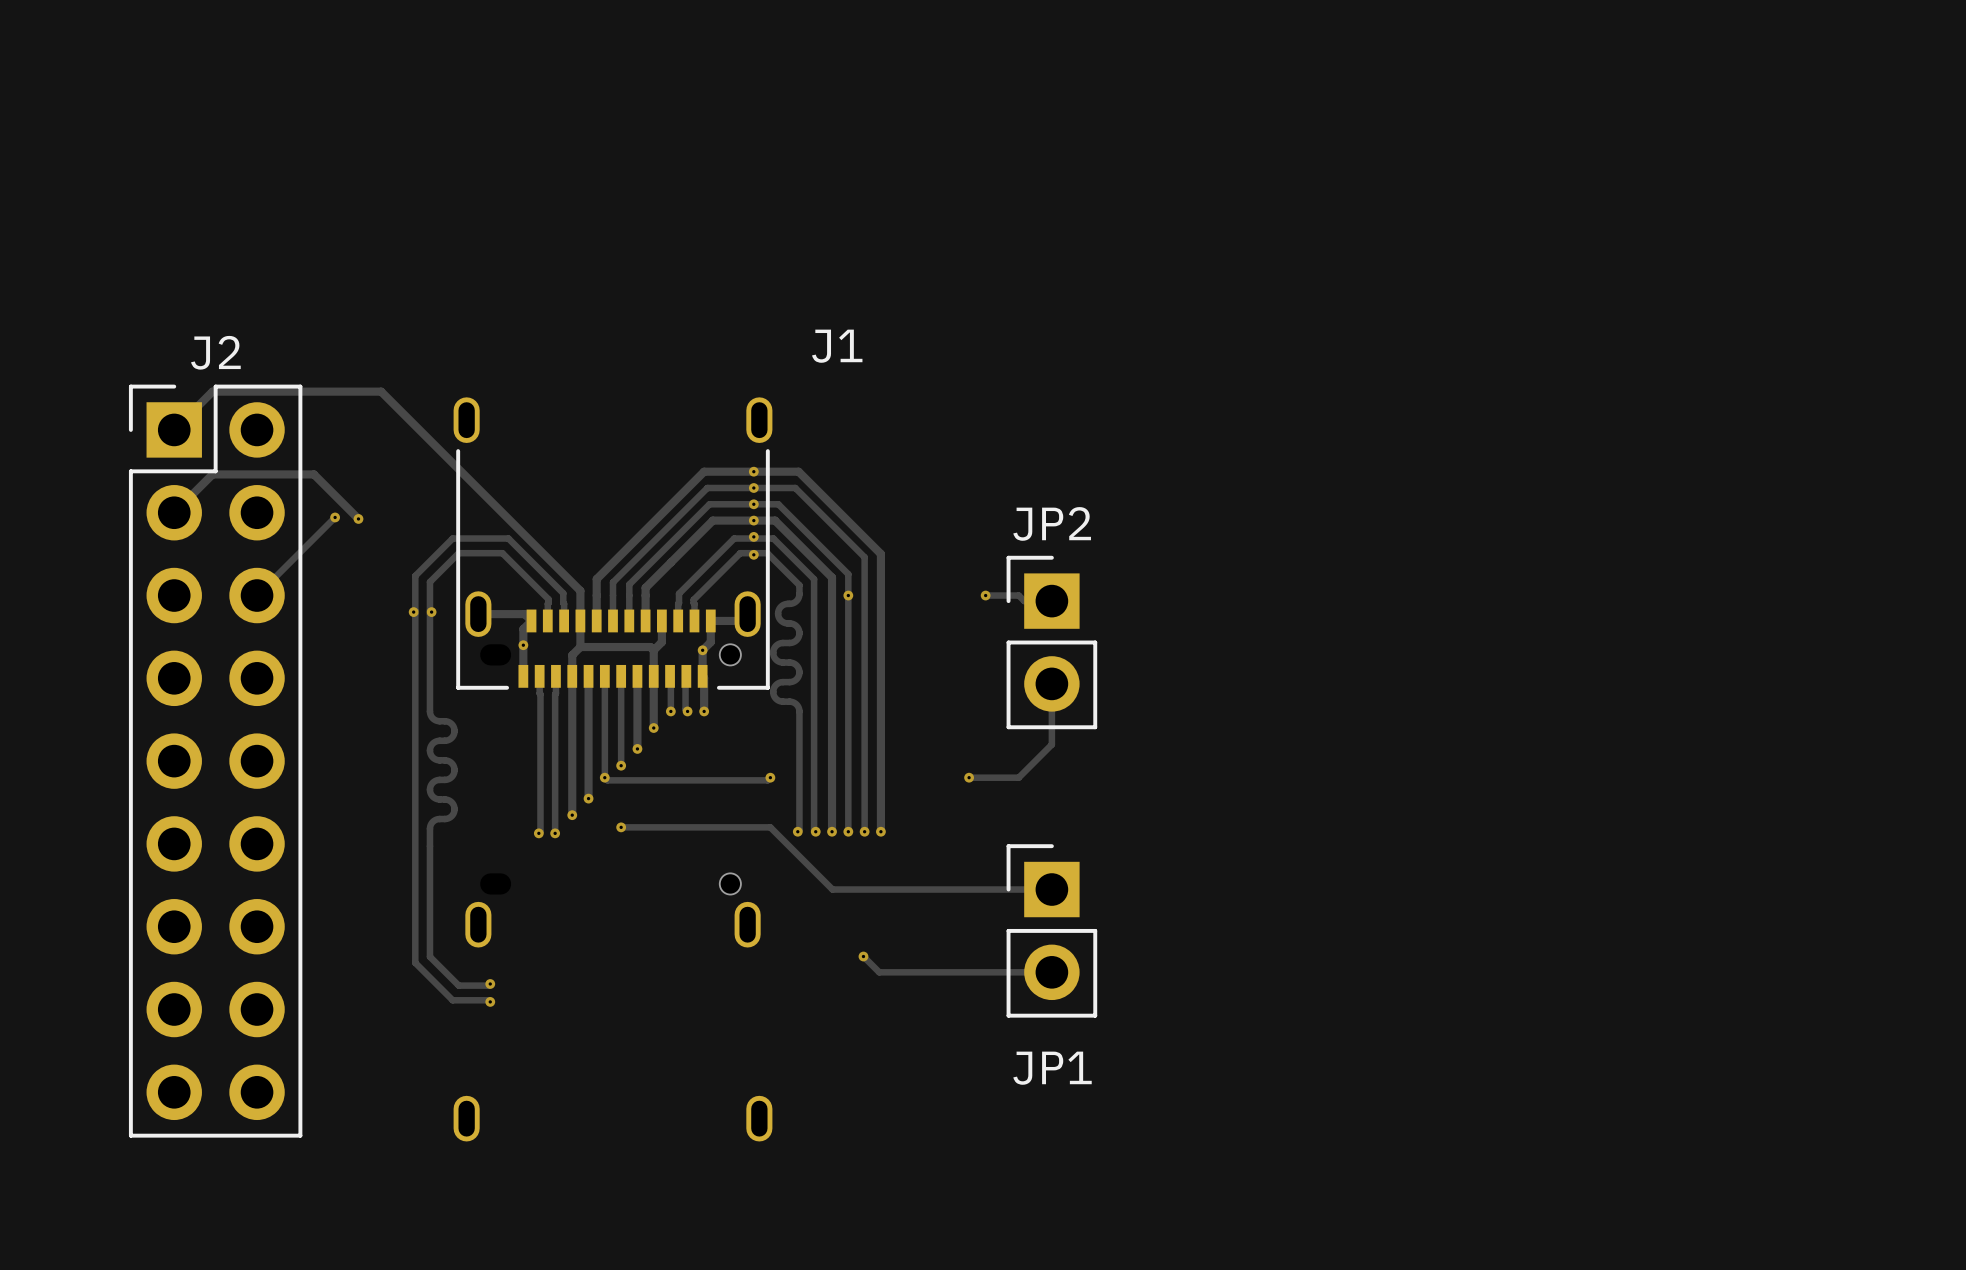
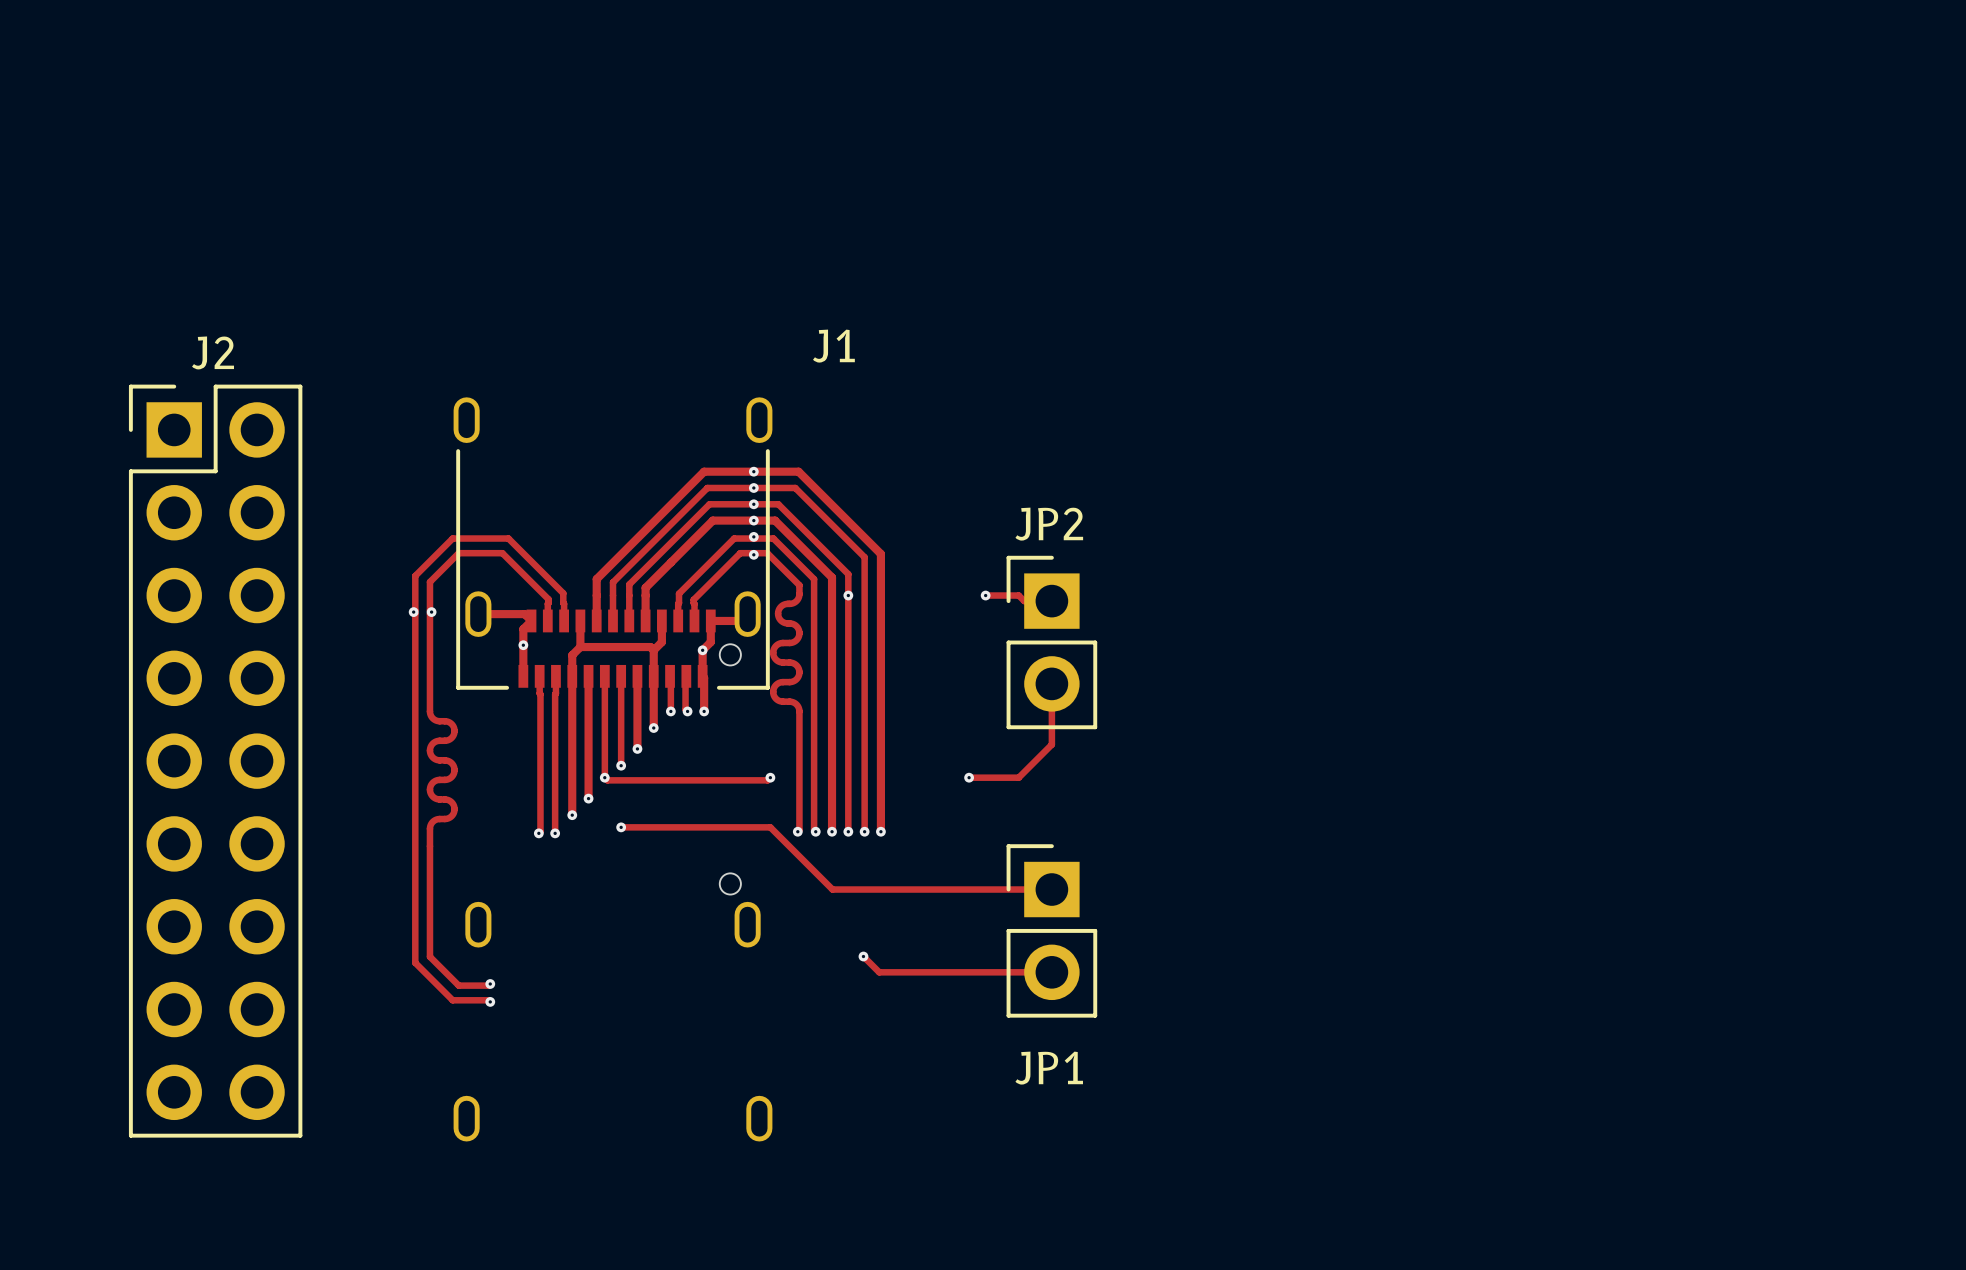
track: (174, 429) (212, 391) (381, 391) (580, 590) (580, 620) -> none
track: (174, 512) (212, 474) (313, 474) (358, 518) -> none
track: (335, 517) (257, 595) -> none
via: (335, 517) -> none
via: (358, 518) -> none

